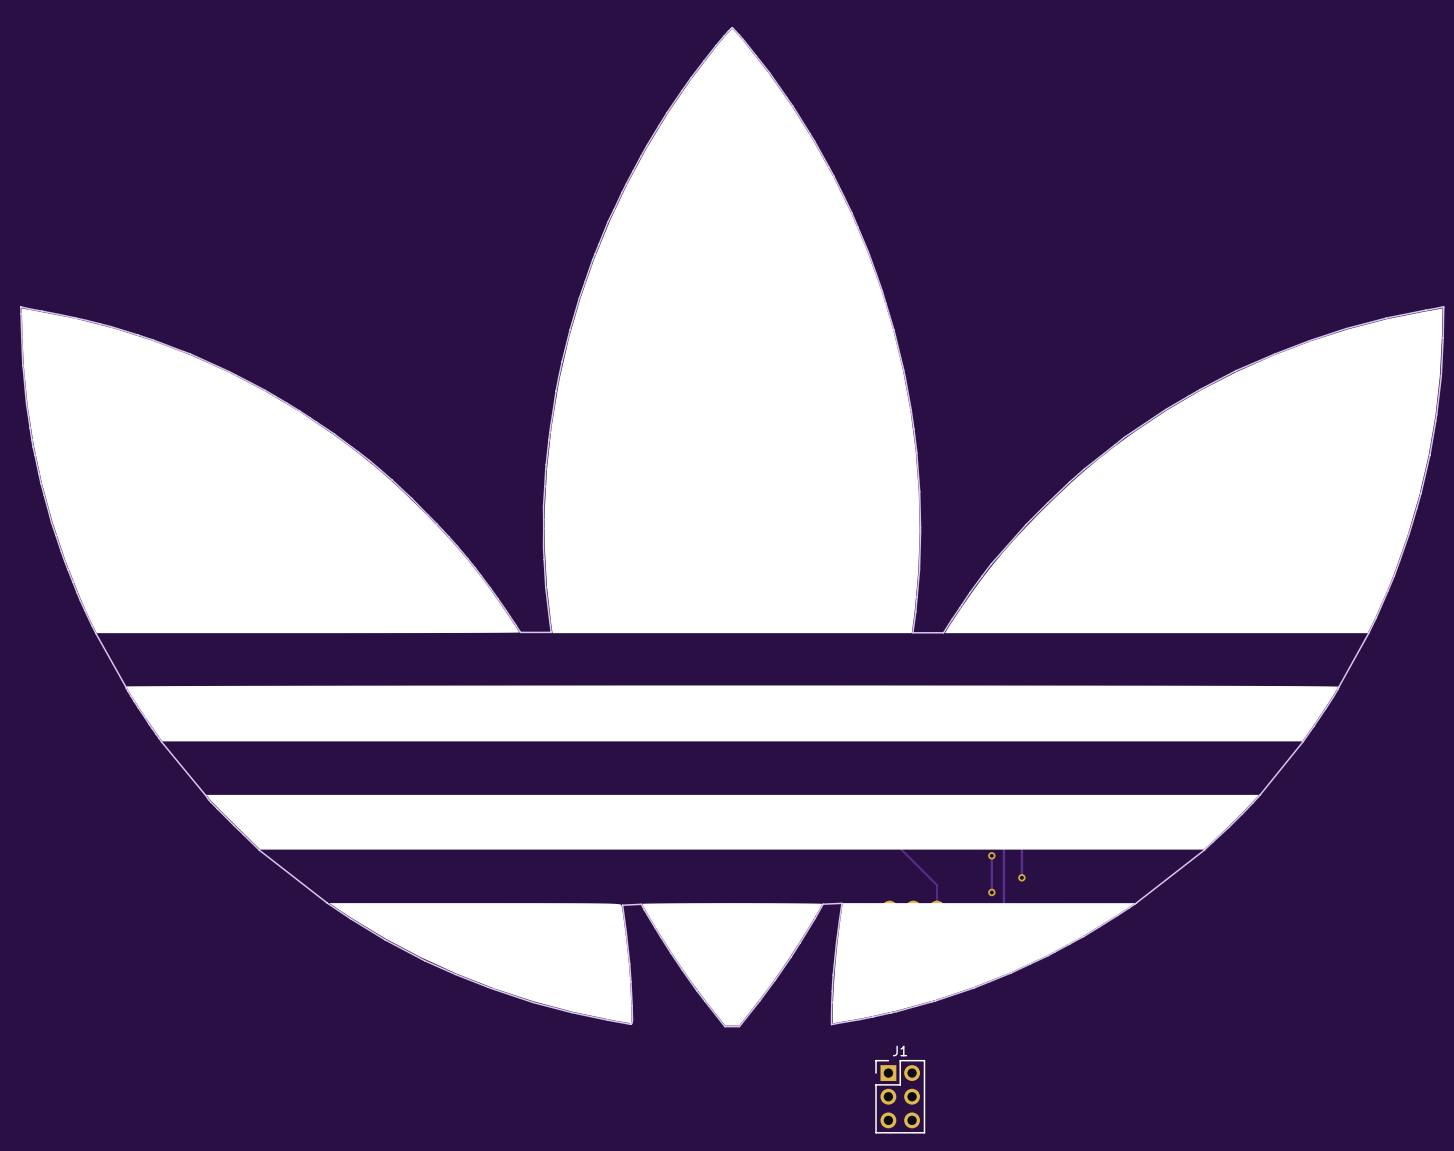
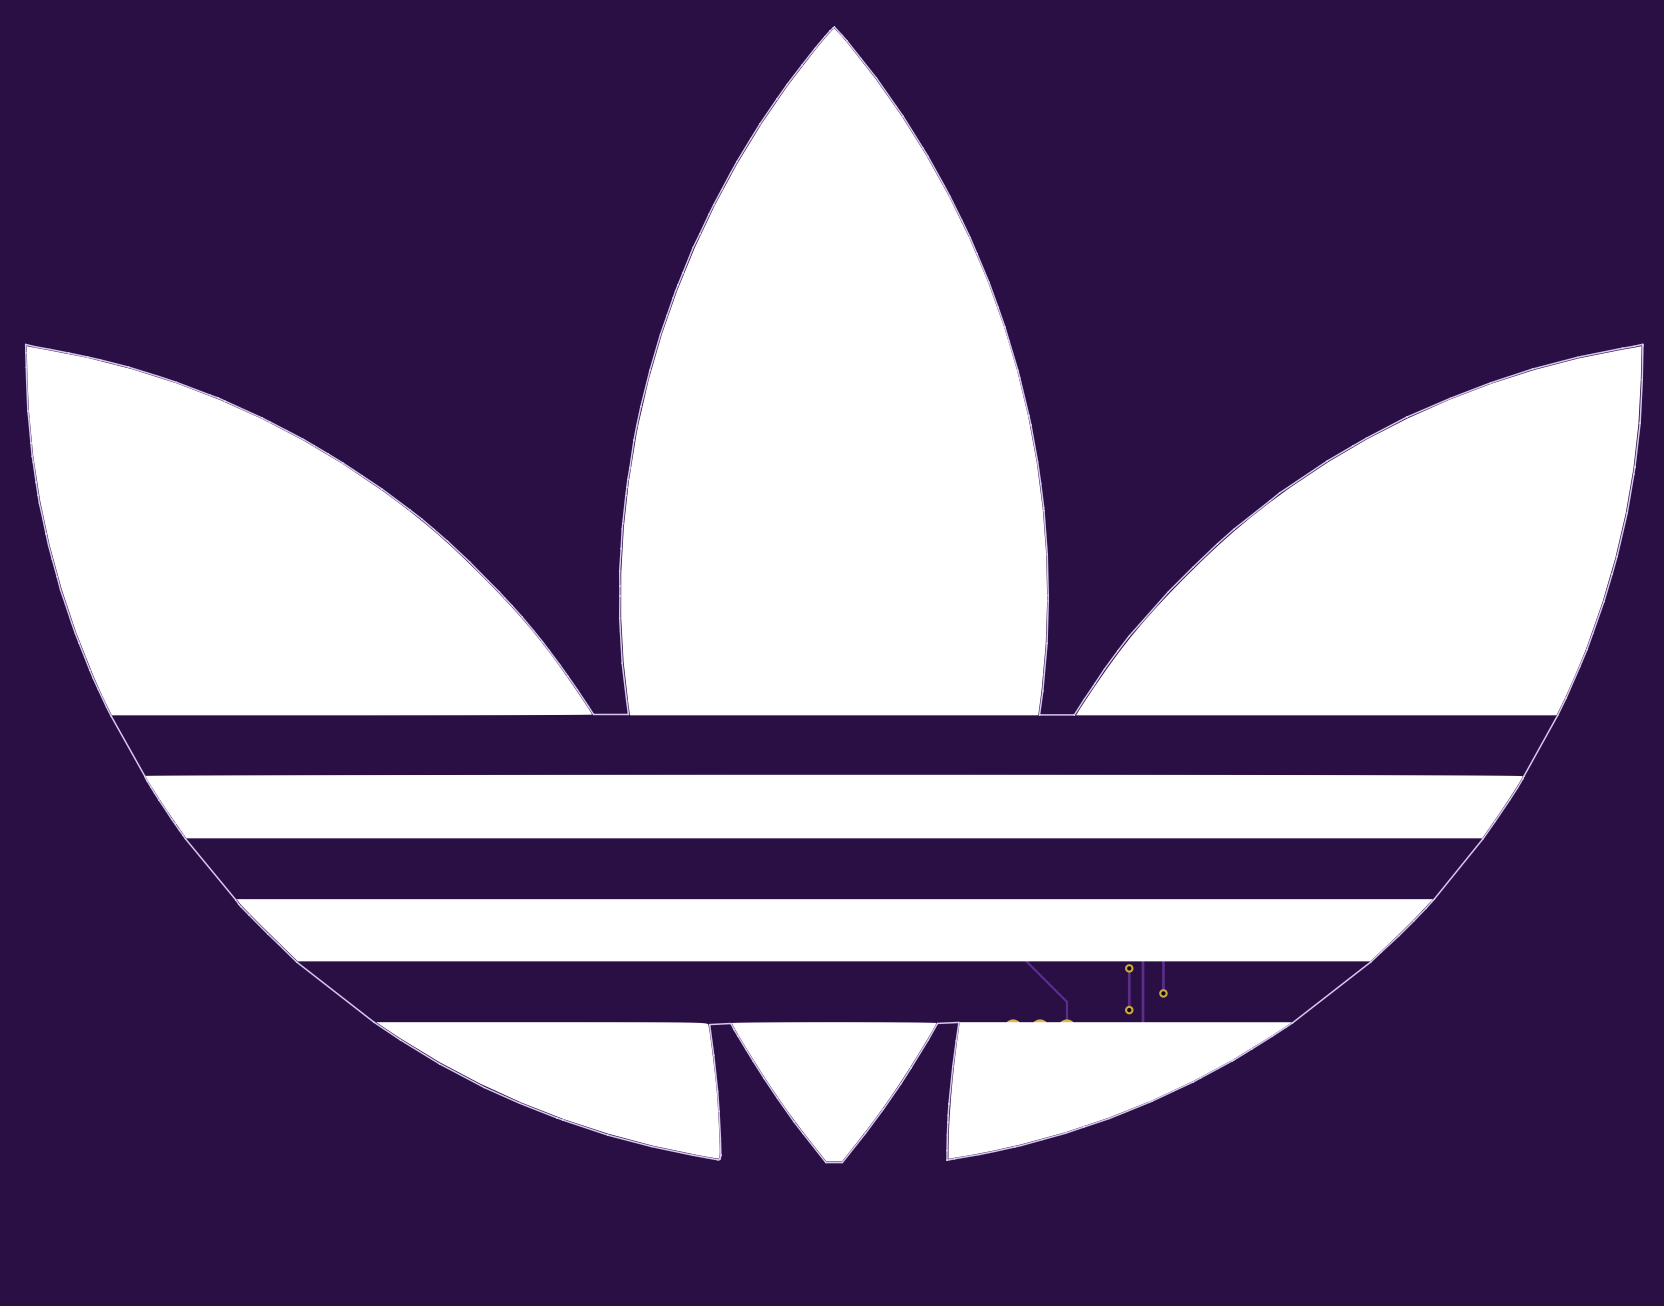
J1: (900, 1096) -> none

